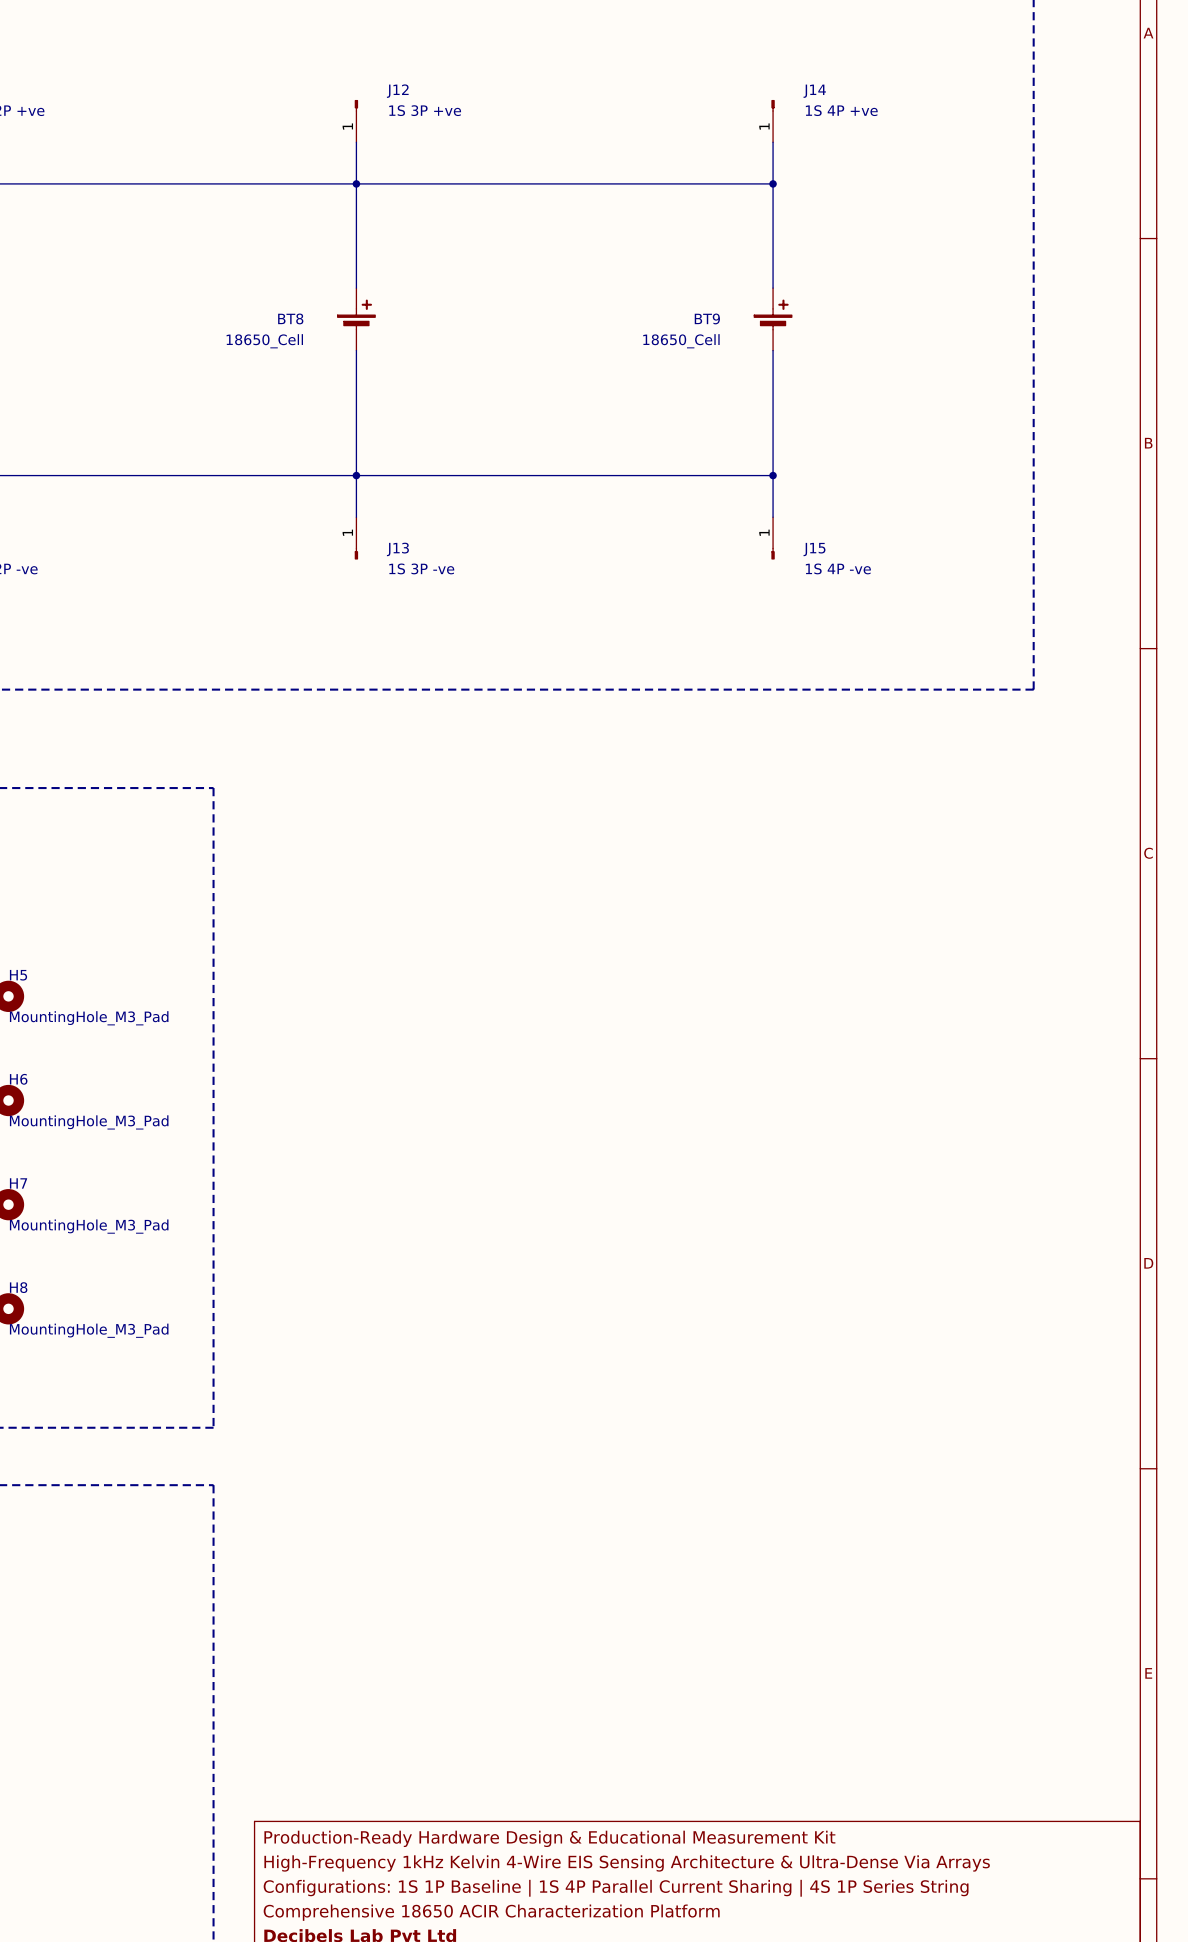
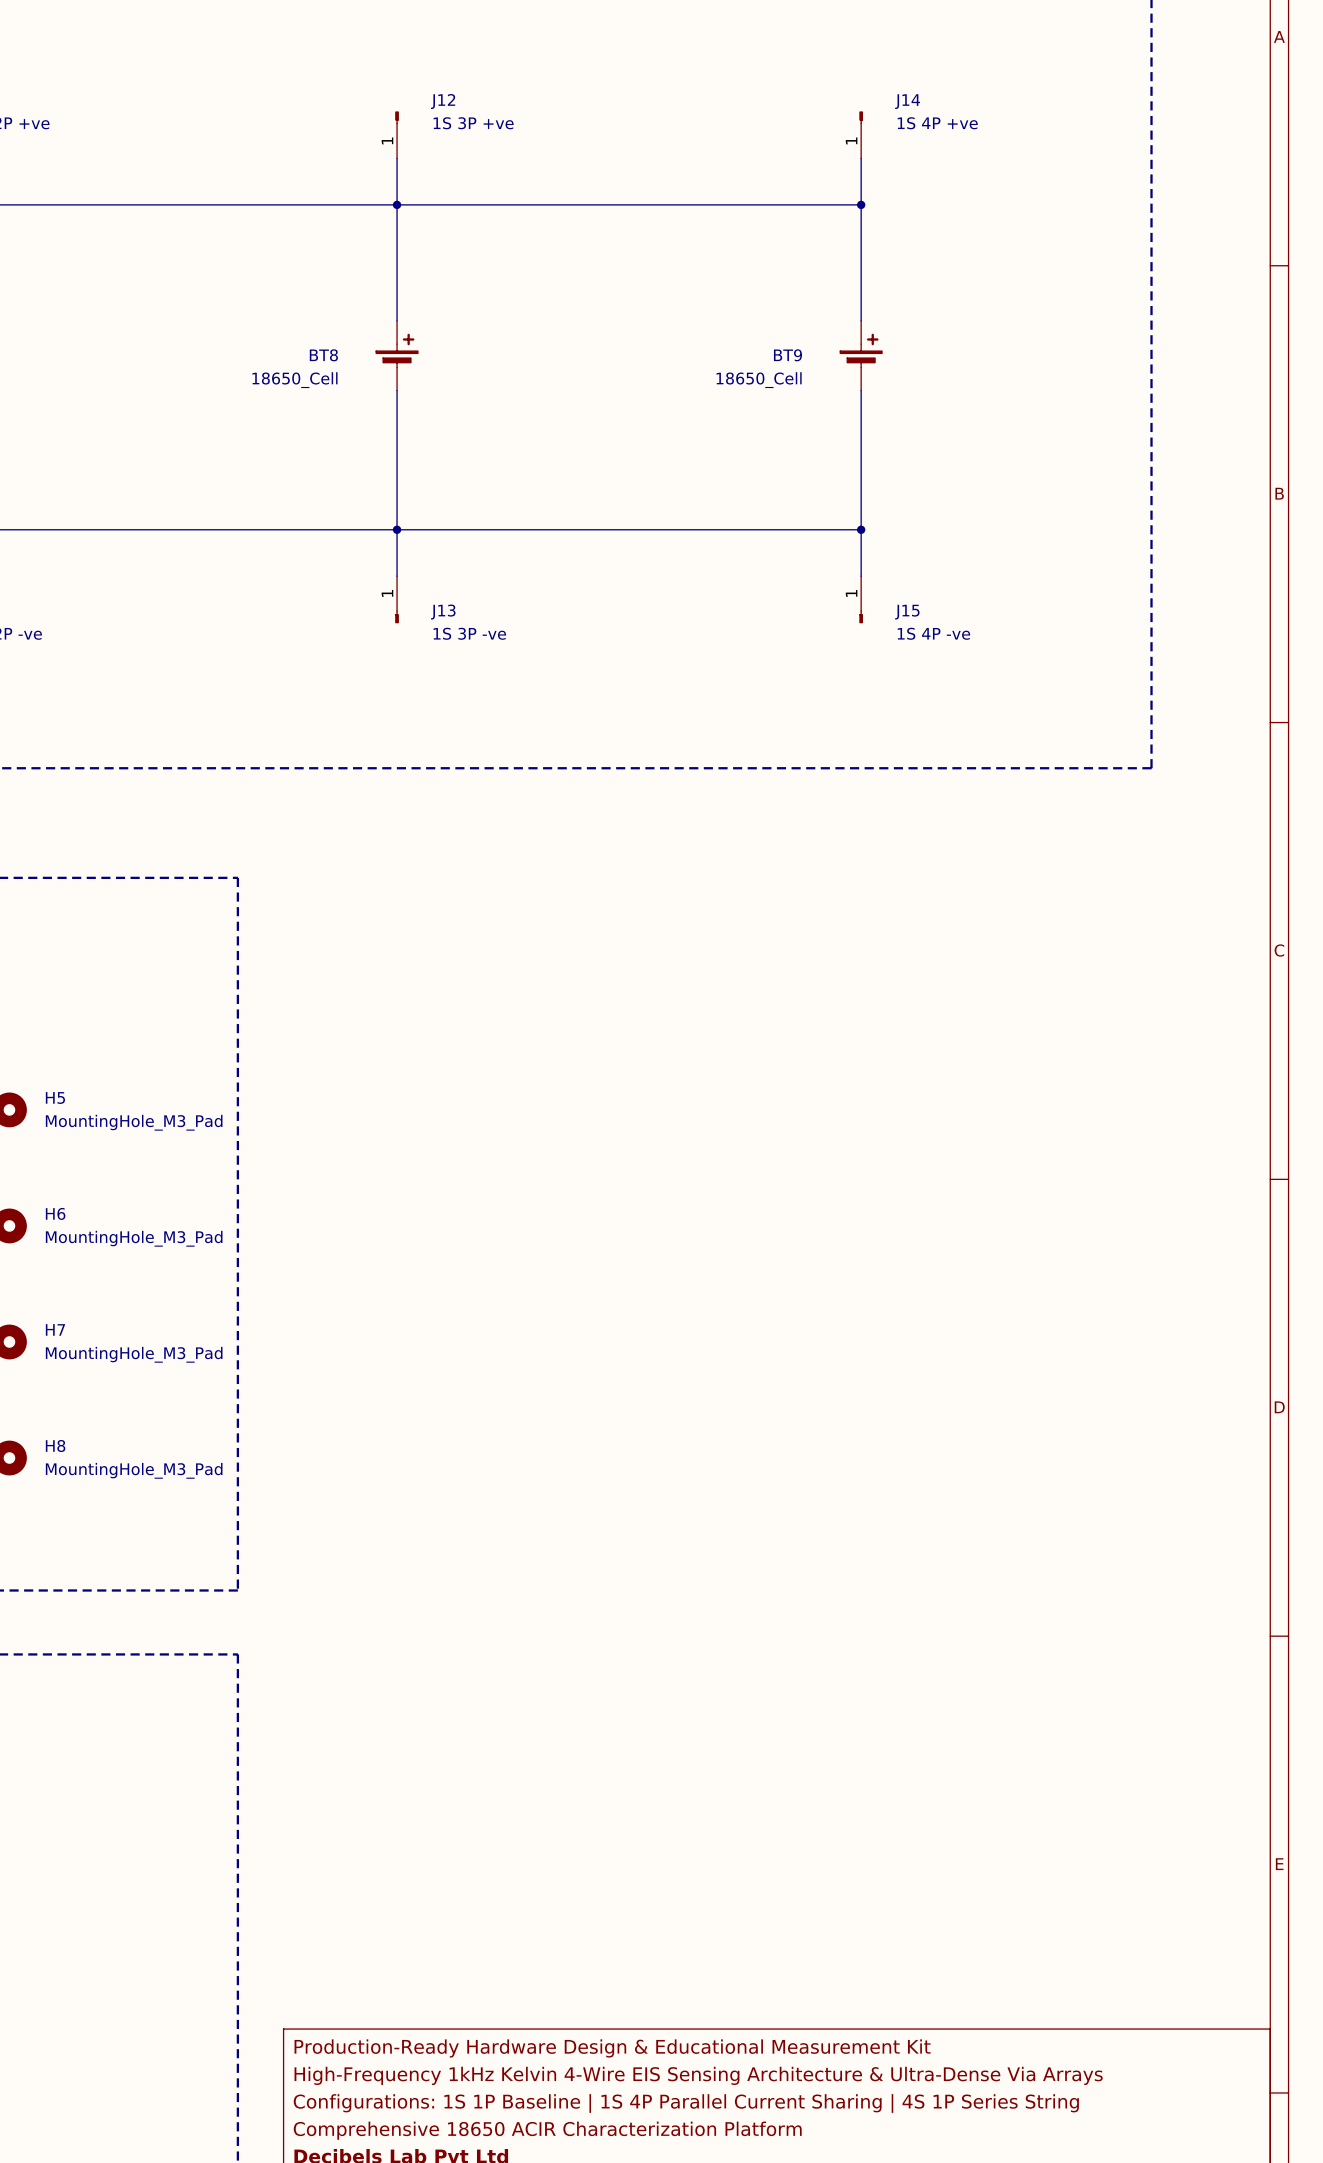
H5 name position: H5 (18, 975) -> H5 (55, 1098)
H5 value position: MountingHole_M3_Pad (89, 1018) -> MountingHole_M3_Pad (134, 1122)
H6 name position: H6 (18, 1079) -> H6 (55, 1213)
H6 value position: MountingHole_M3_Pad (89, 1122) -> MountingHole_M3_Pad (134, 1238)
H7 name position: H7 (18, 1183) -> H7 (55, 1329)
H7 value position: MountingHole_M3_Pad (89, 1226) -> MountingHole_M3_Pad (134, 1354)
H8 name position: H8 (18, 1287) -> H8 (55, 1445)
H8 value position: MountingHole_M3_Pad (89, 1330) -> MountingHole_M3_Pad (134, 1470)

